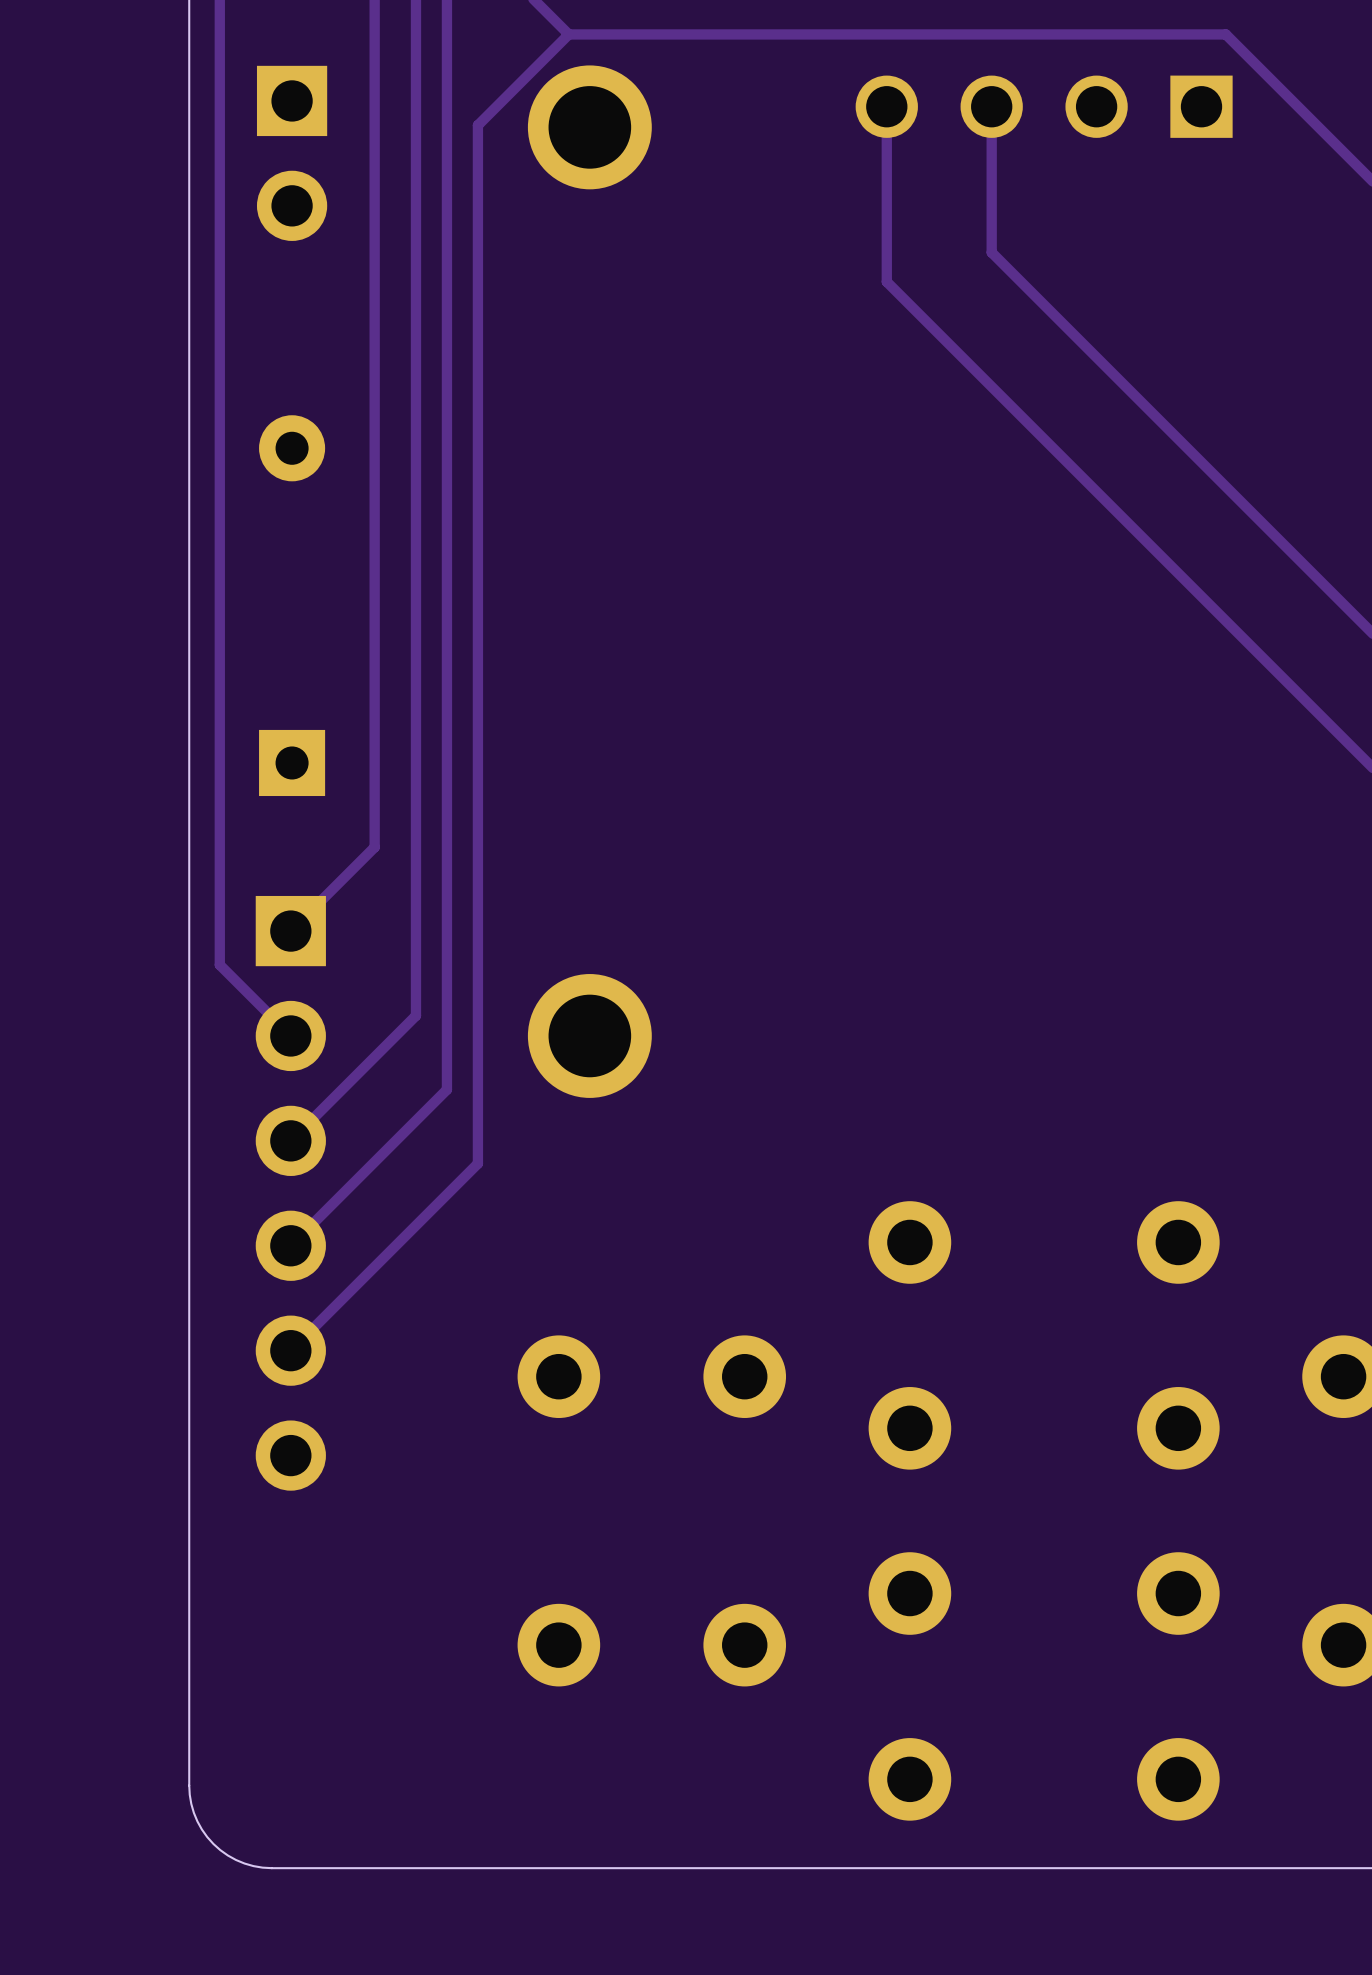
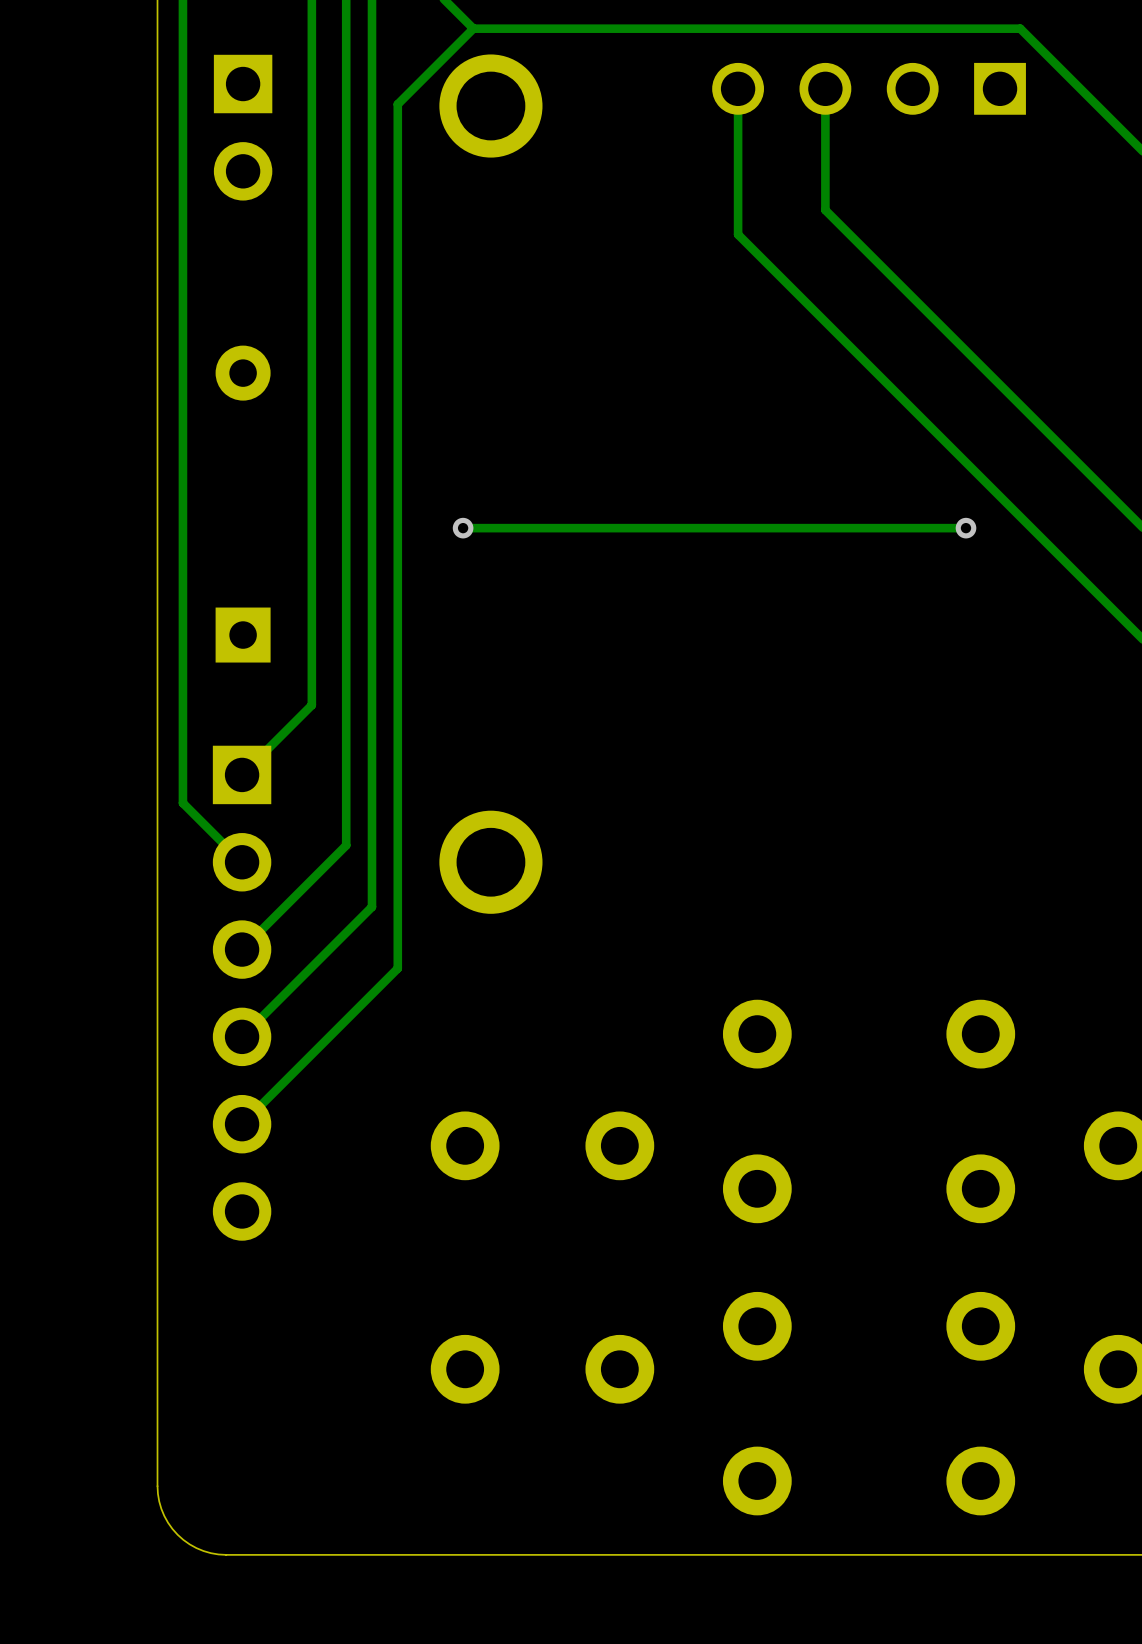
via: none -> (463, 528)
track: none -> (965, 528) (463, 528)
via: none -> (965, 528)

